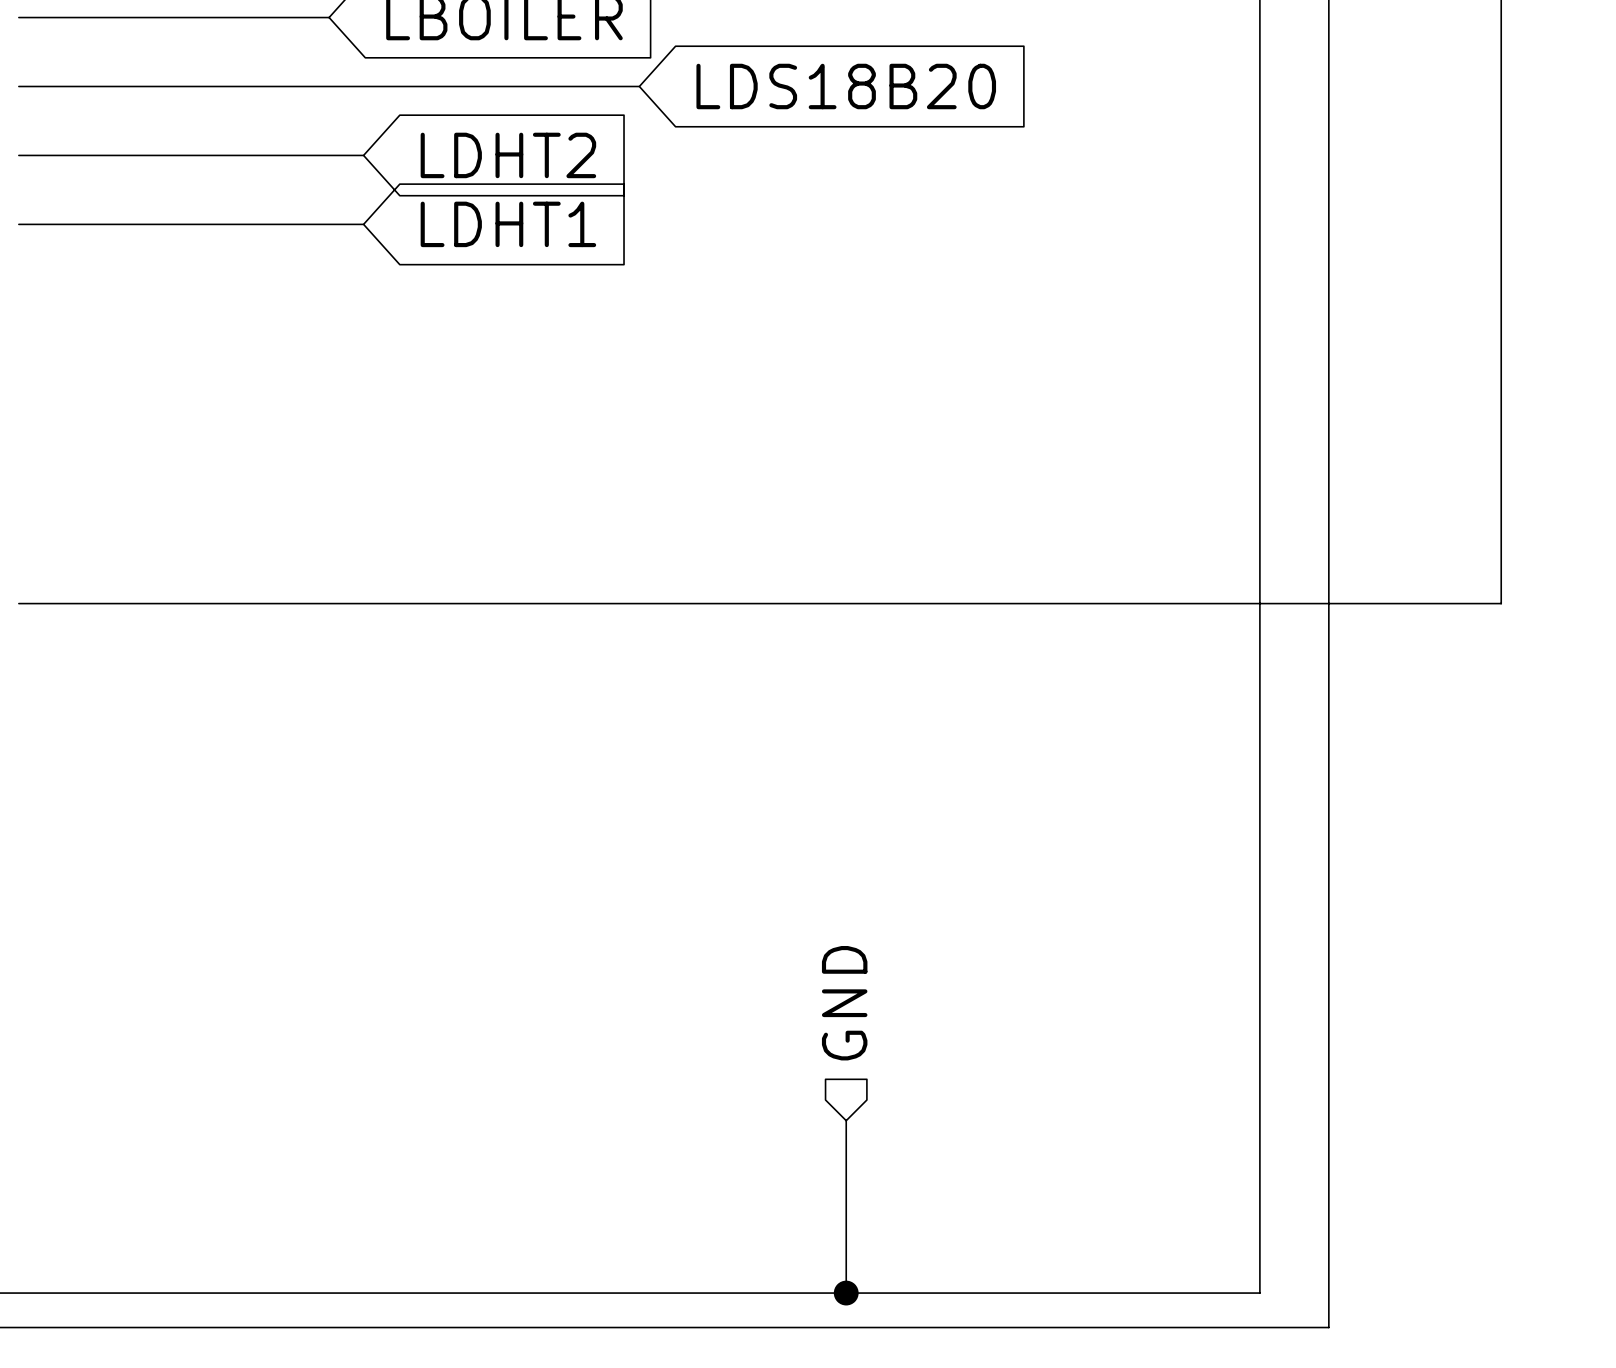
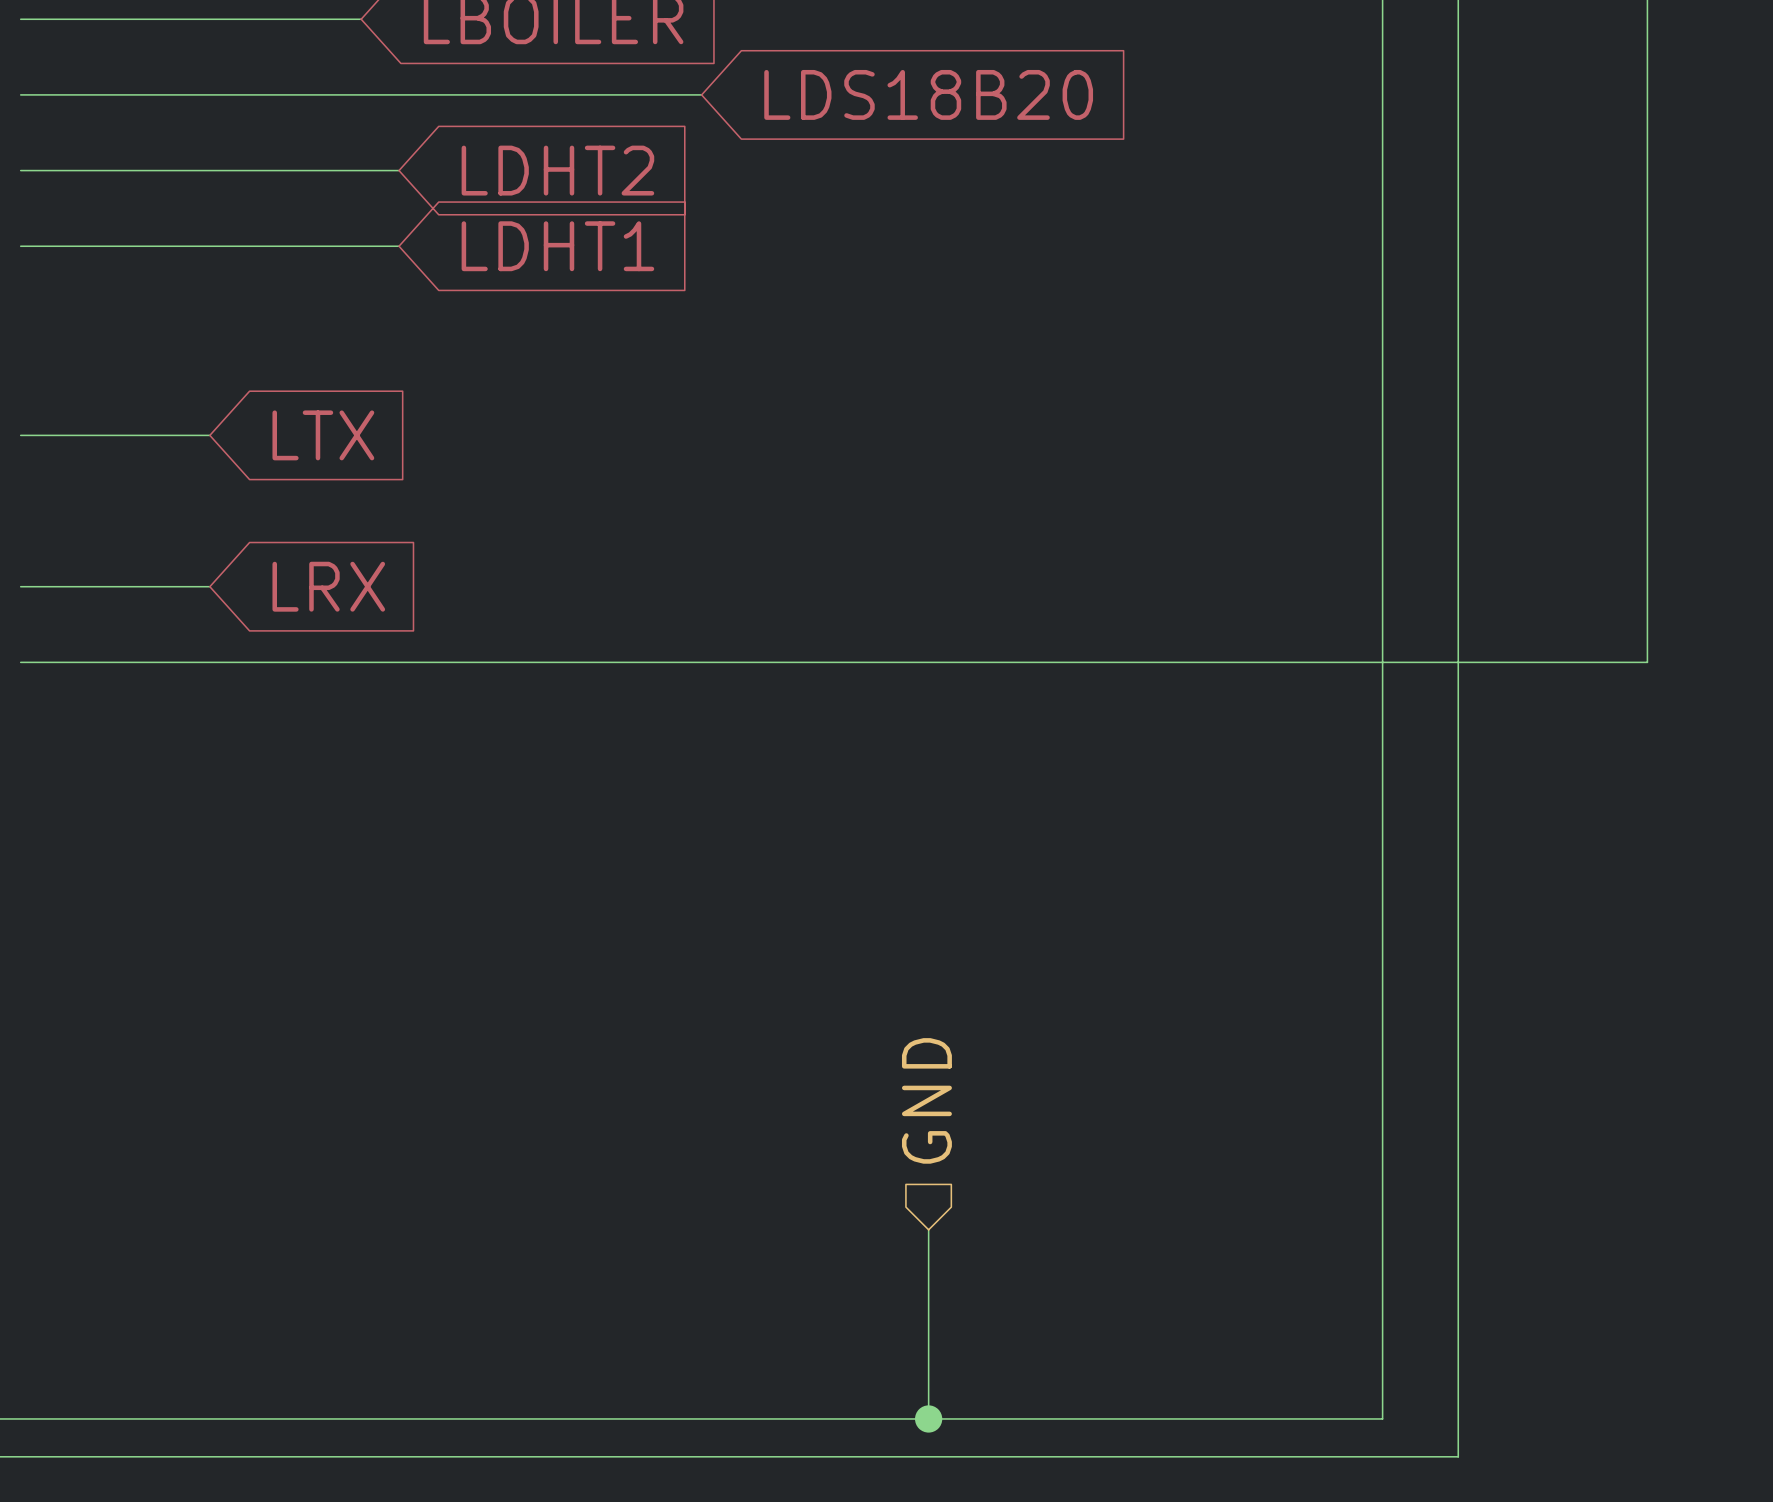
wire: none -> (20, 435) (209, 435)
global label: none -> LTX (323, 435)
wire: none -> (20, 586) (209, 586)
global label: none -> LRX (328, 586)

